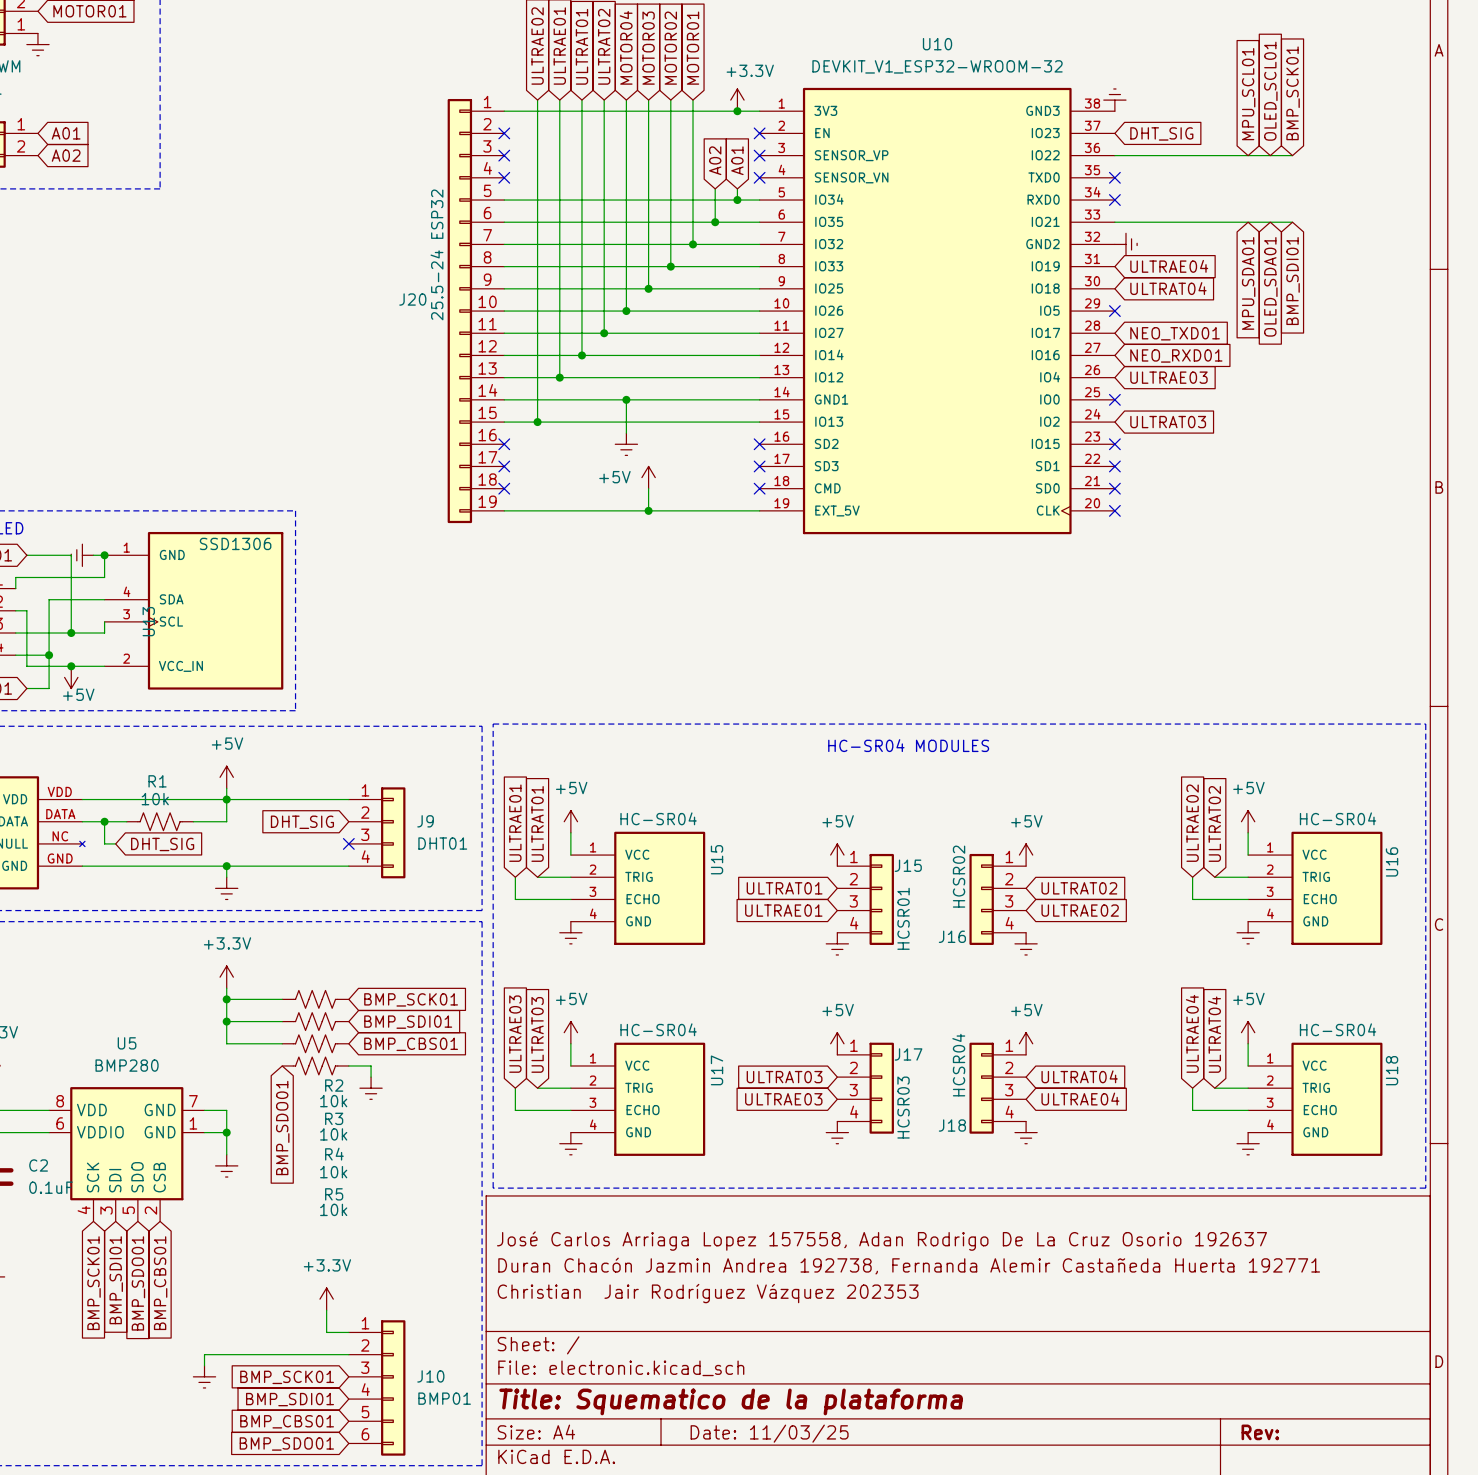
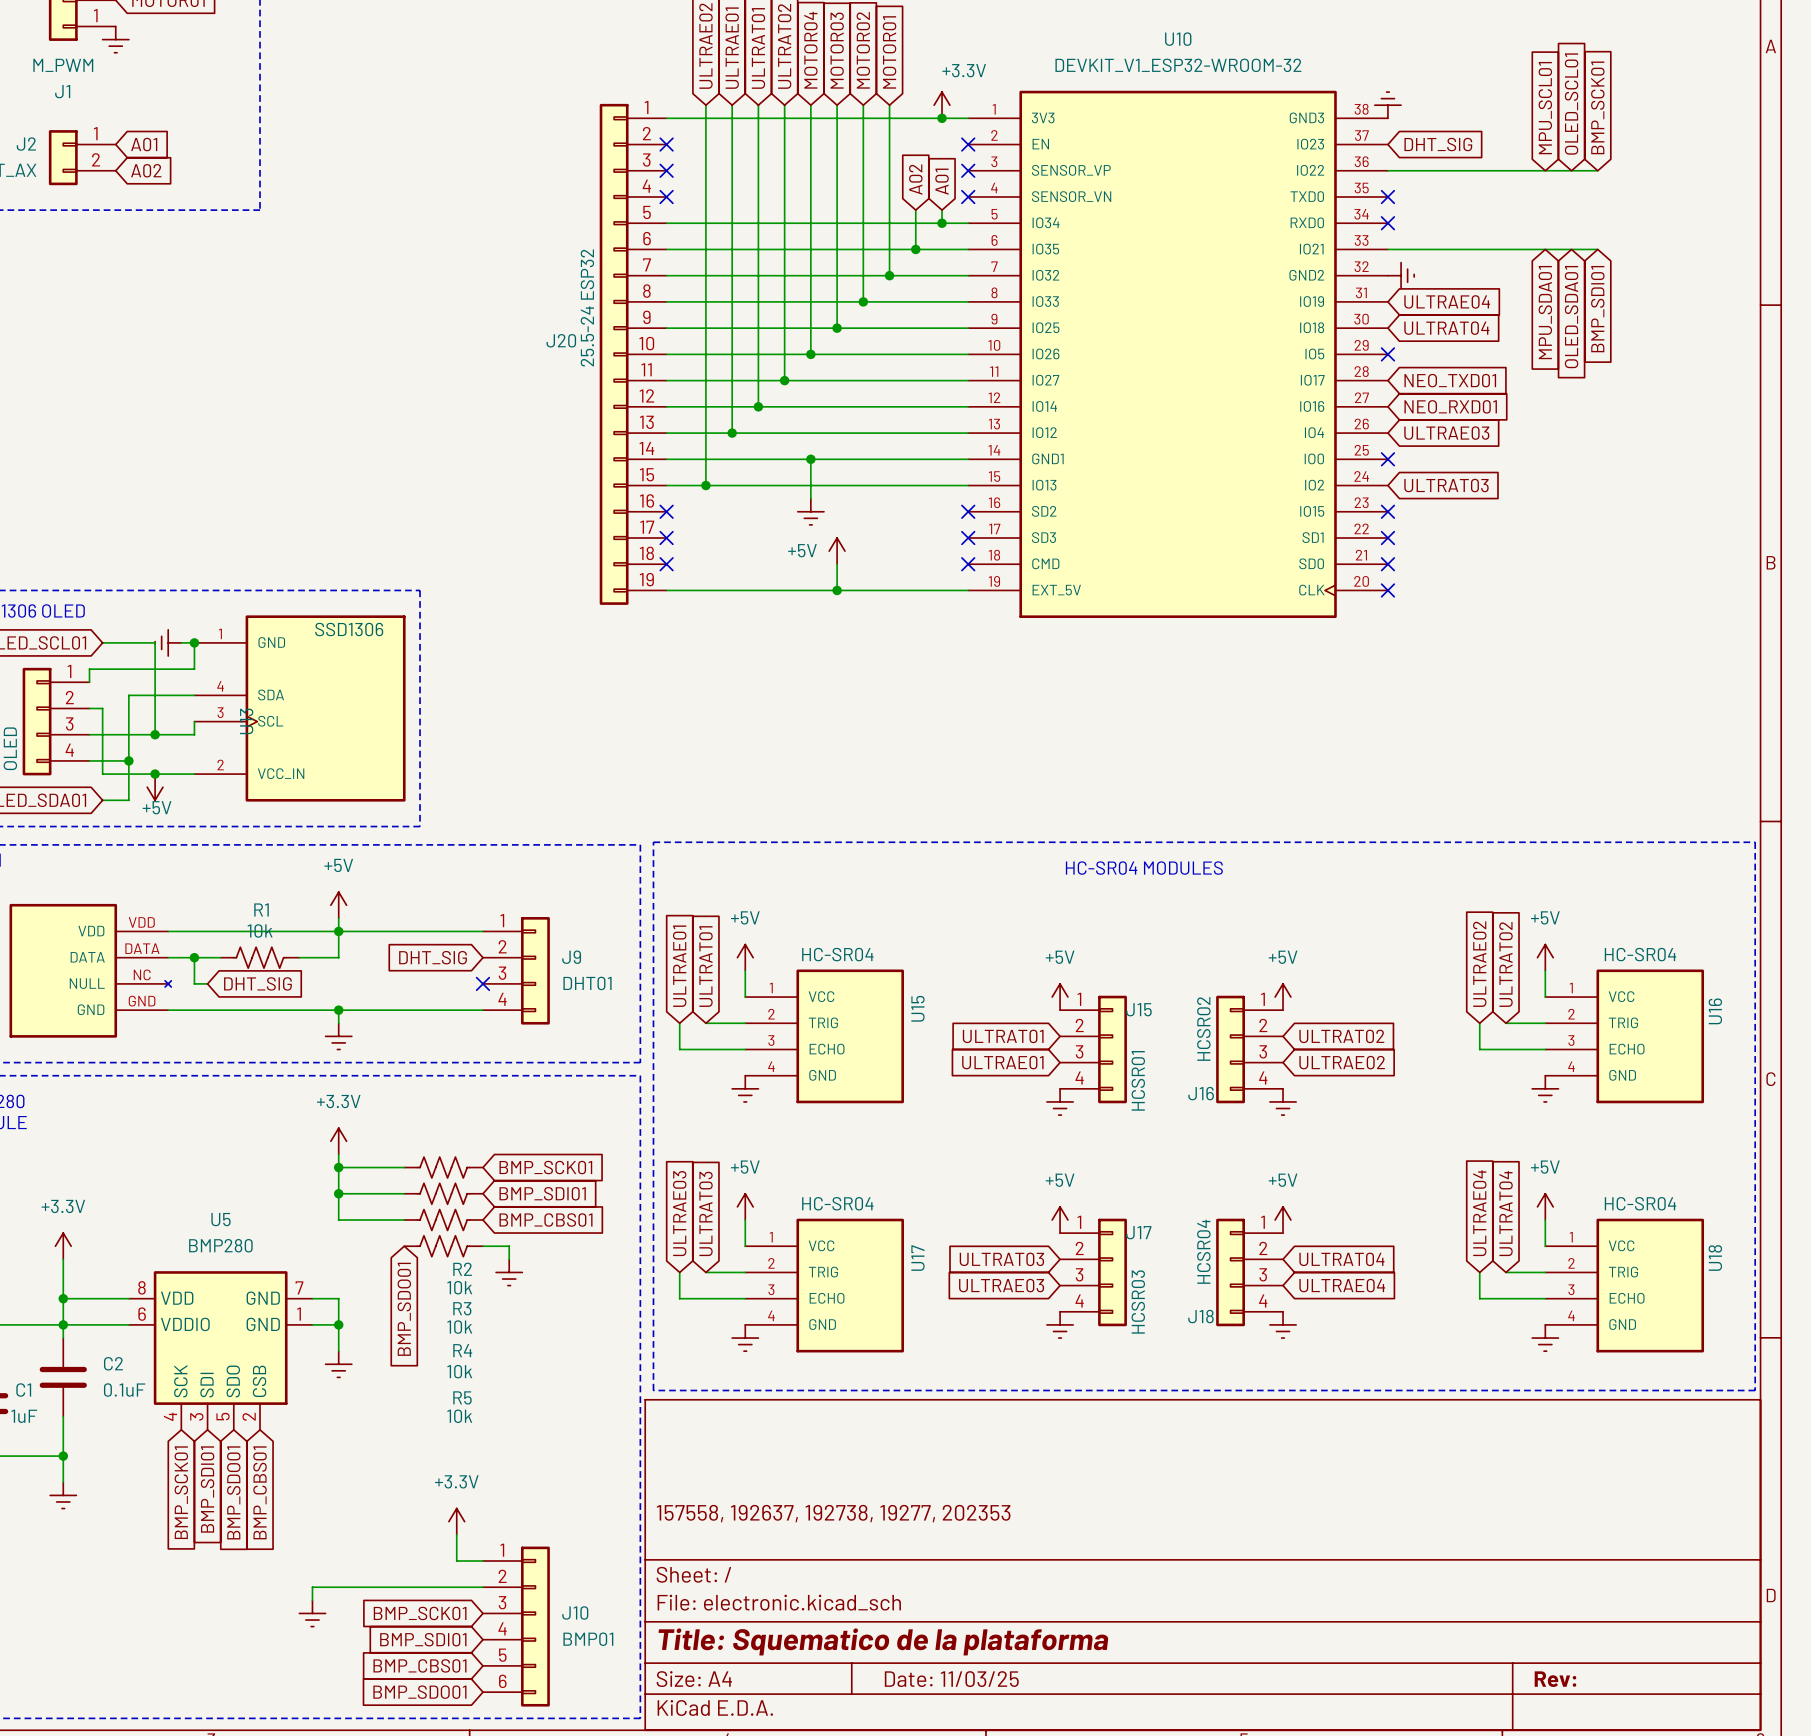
title block: José Carlos Arriaga Lopez 157558, Adan Rodrigo De La Cruz Osorio 192637 (881, 1241) -> none
title block: Duran Chacón Jazmin Andrea 192738, Fernanda Alemir Castañeda Huerta 192771 (909, 1266) -> none
title block: Christian Jair Rodríguez Vázquez 202353 (708, 1293) -> 157558, 192637, 192738, 19277, 202353 (833, 1513)

